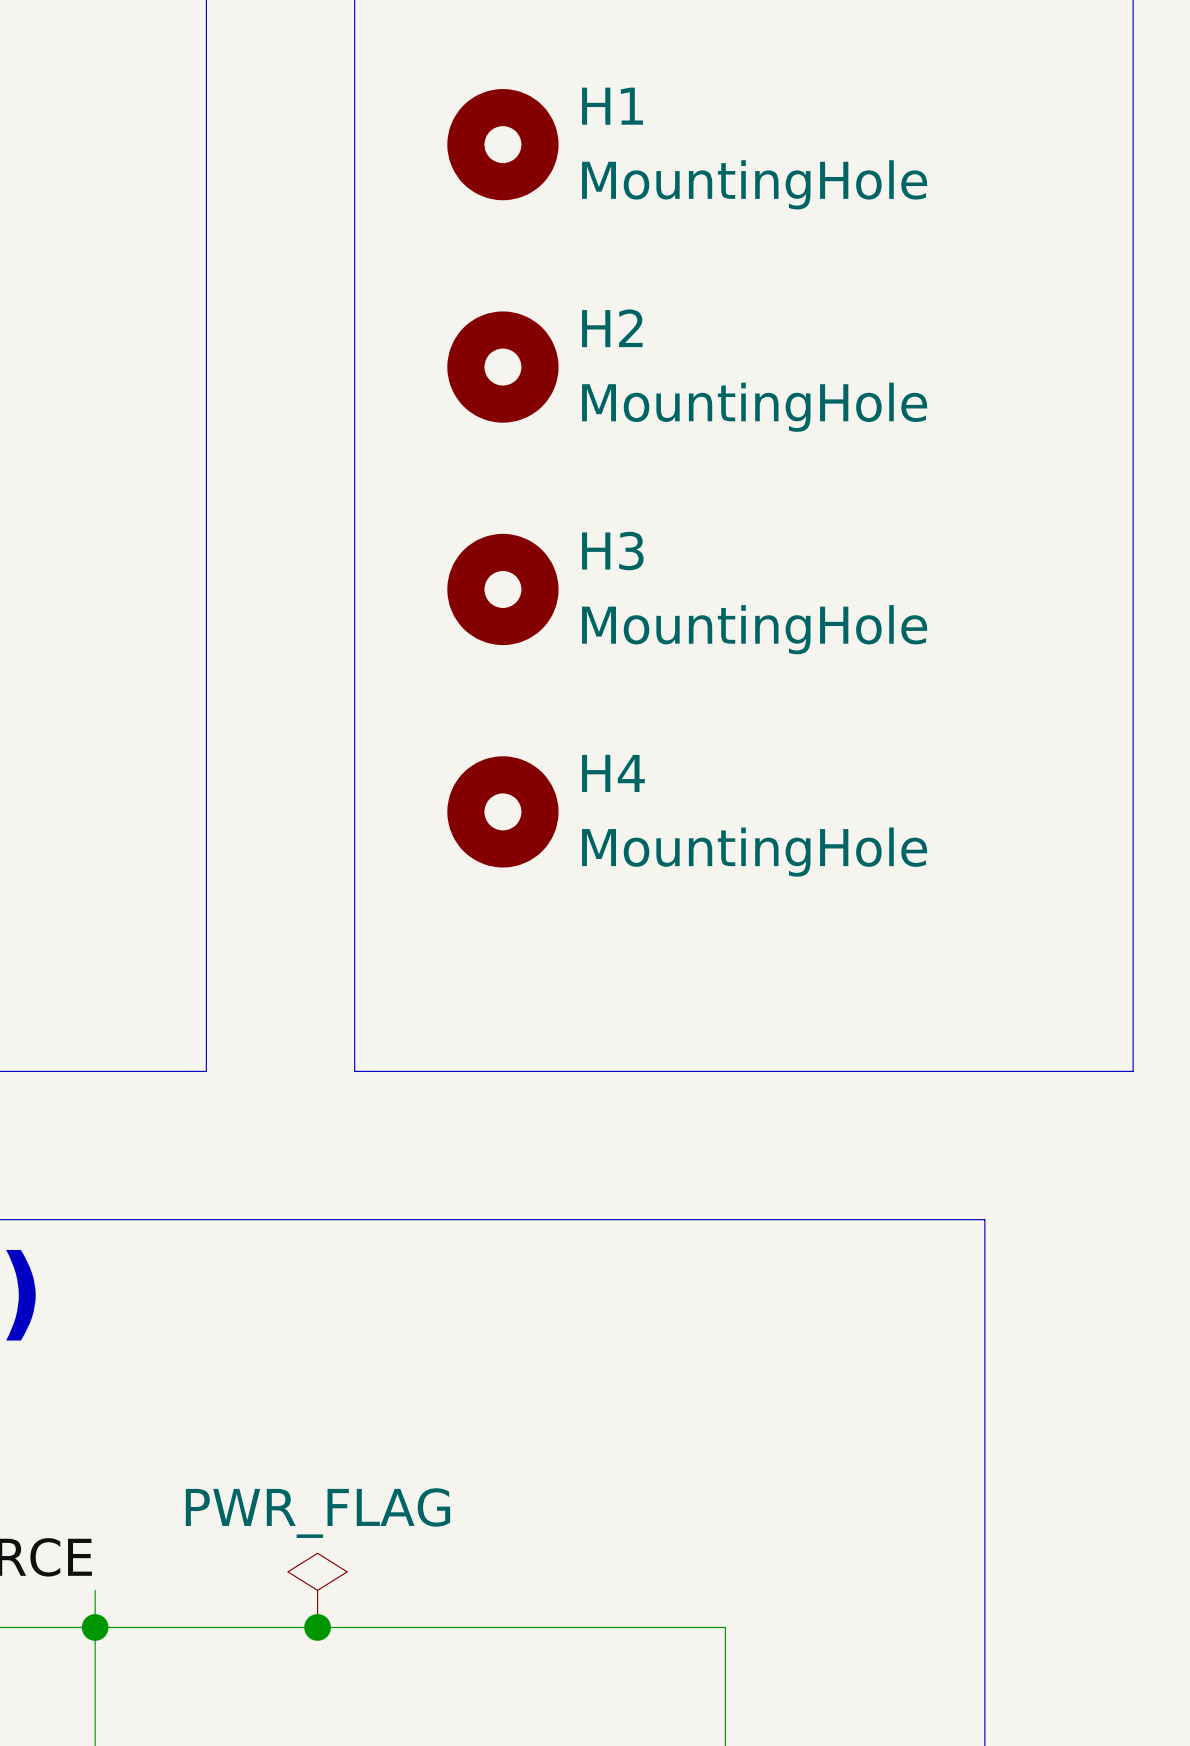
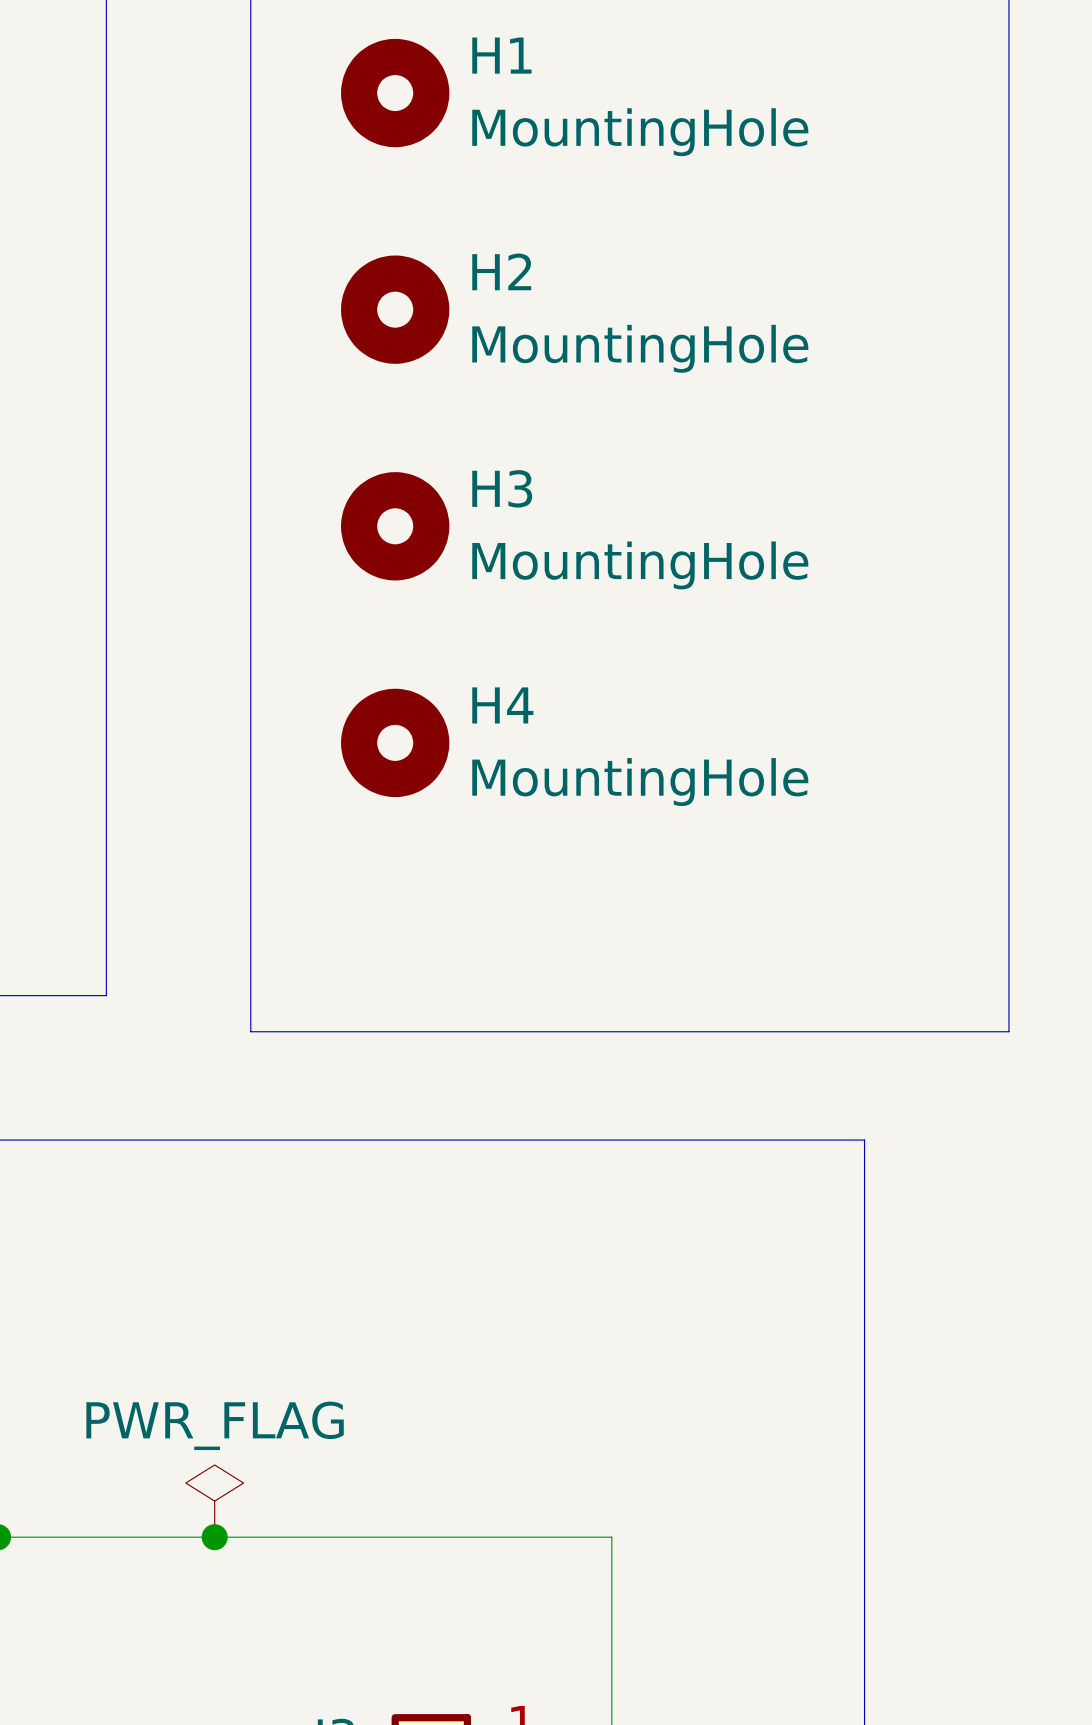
line: (354, 1071) (1133, 1071) -> (250, 995) (250, 1031) (1008, 1031) (1008, 995)

